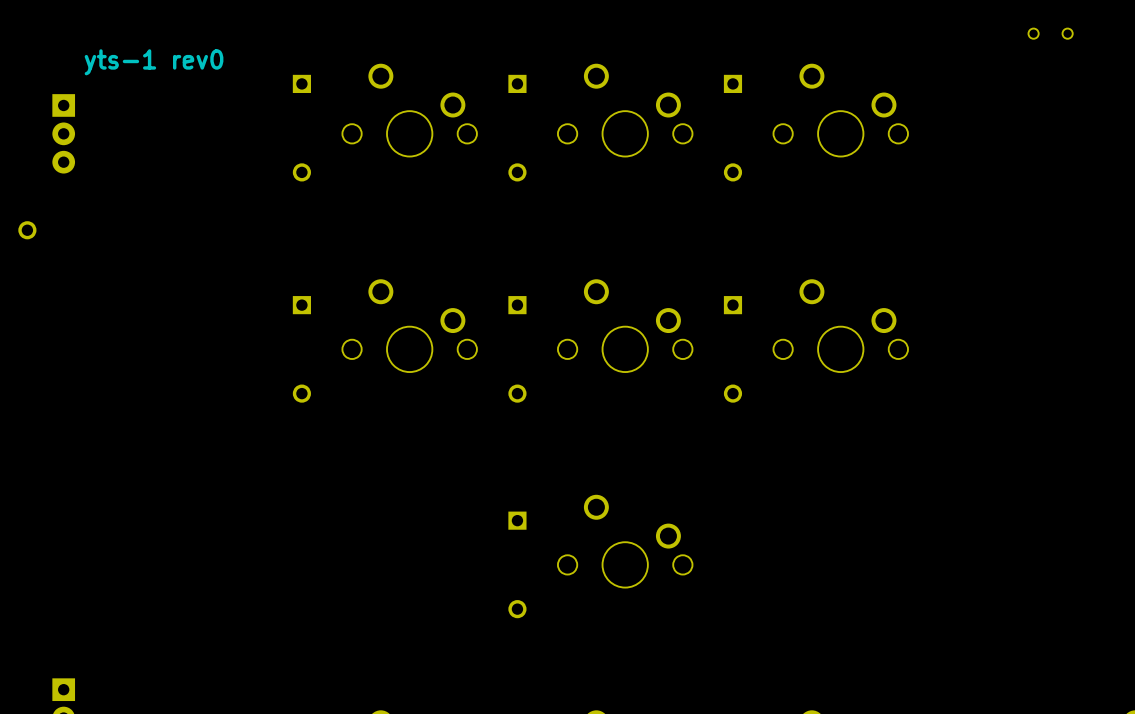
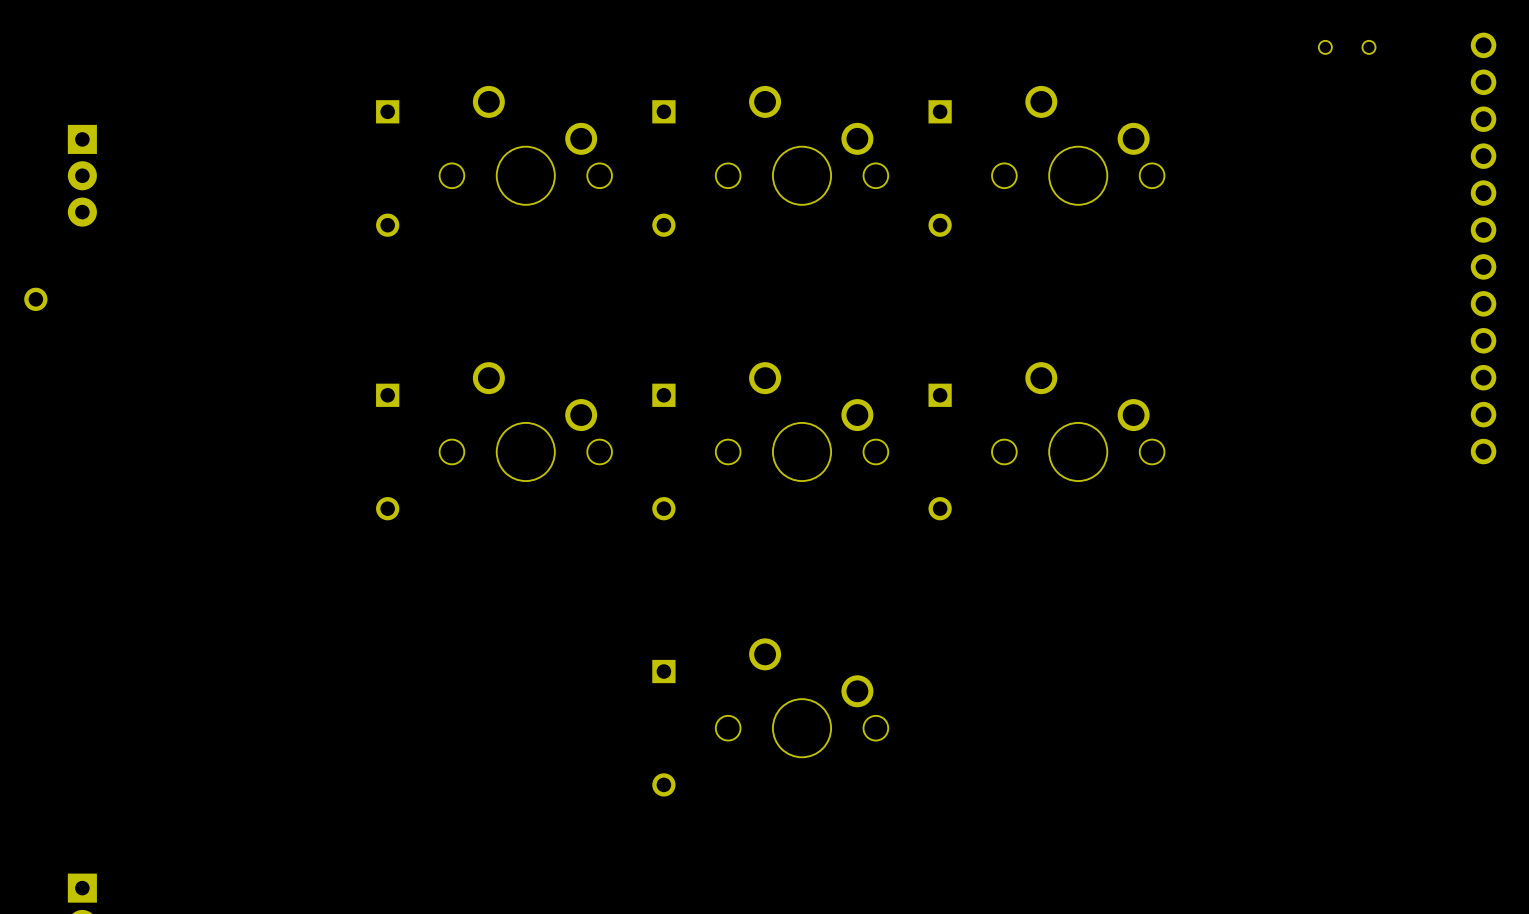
text: yts-1 rev0 (154, 62) -> none

